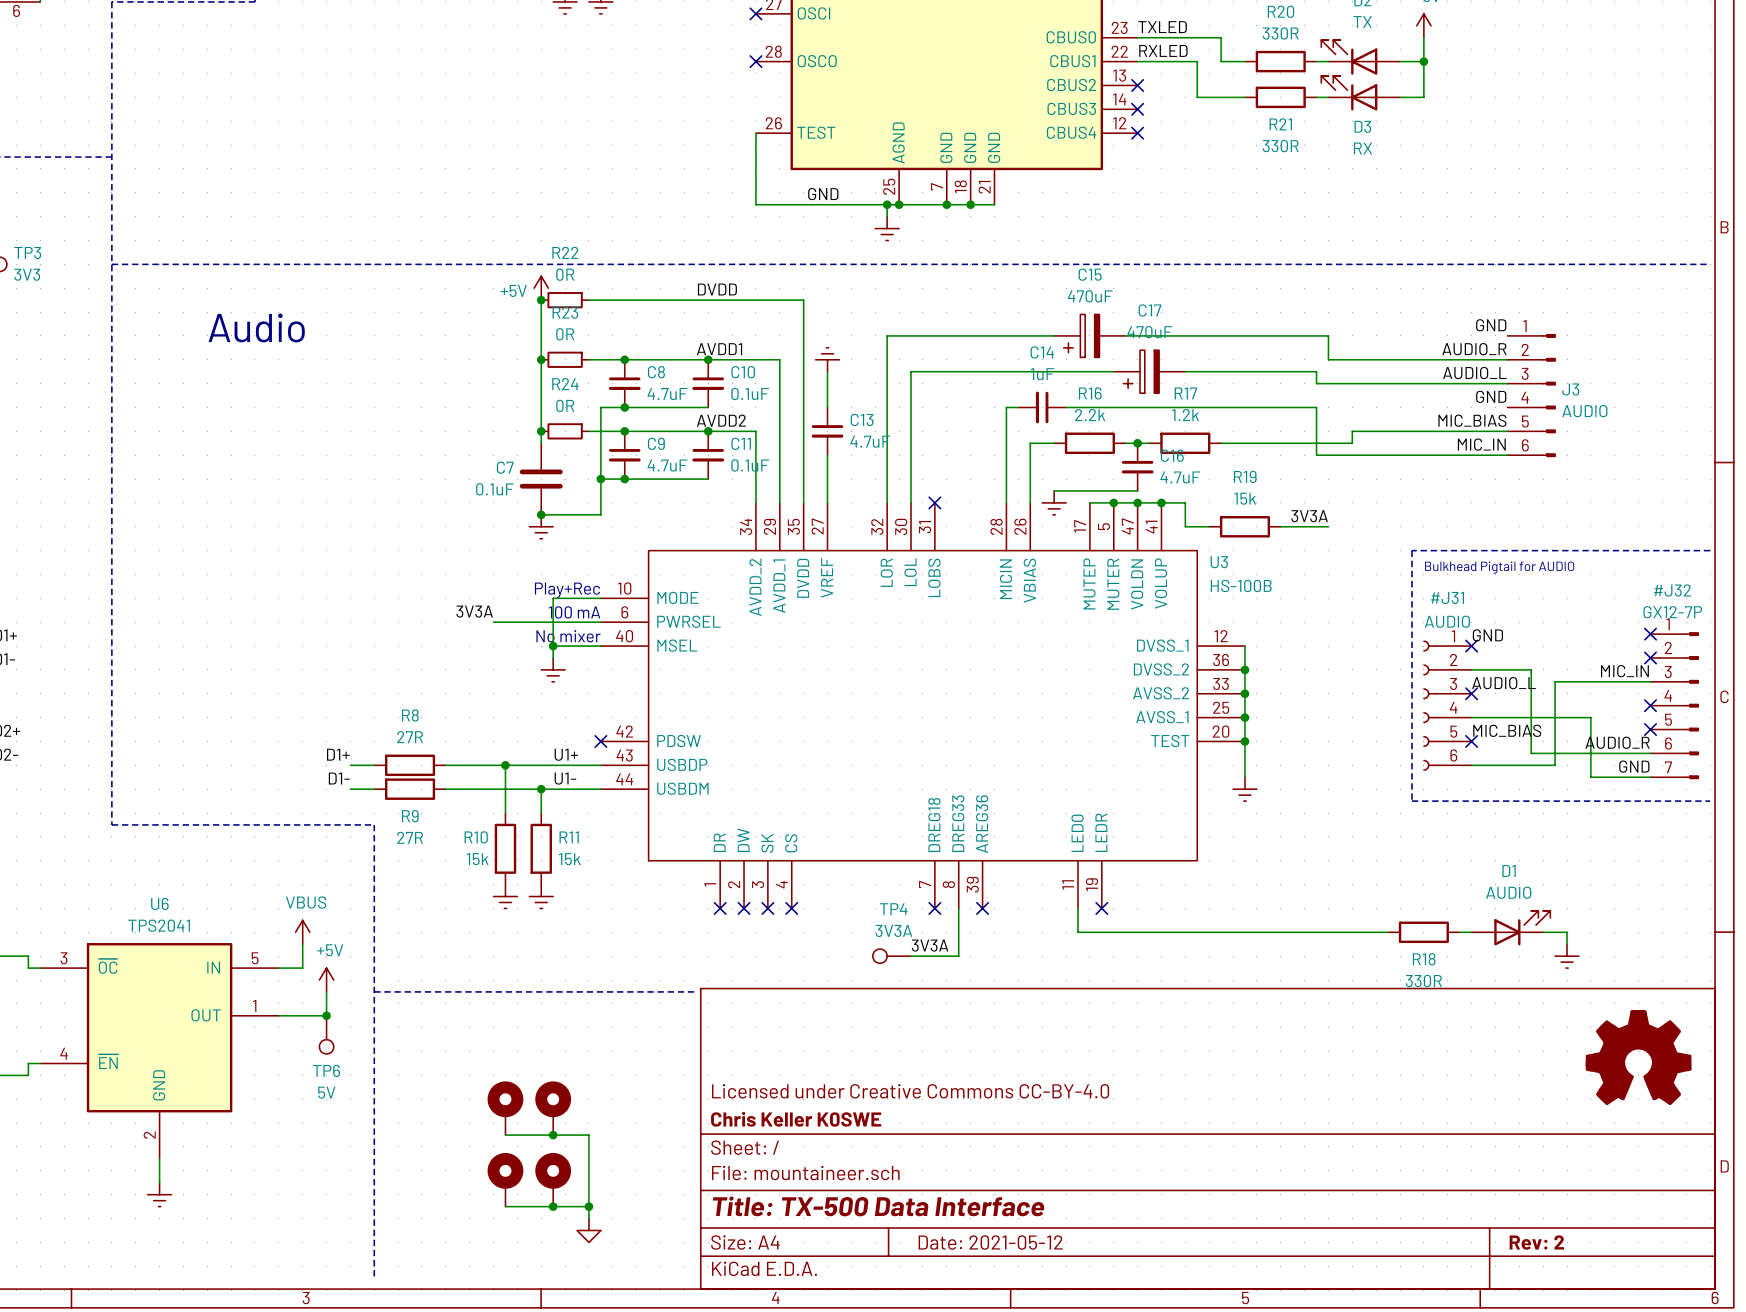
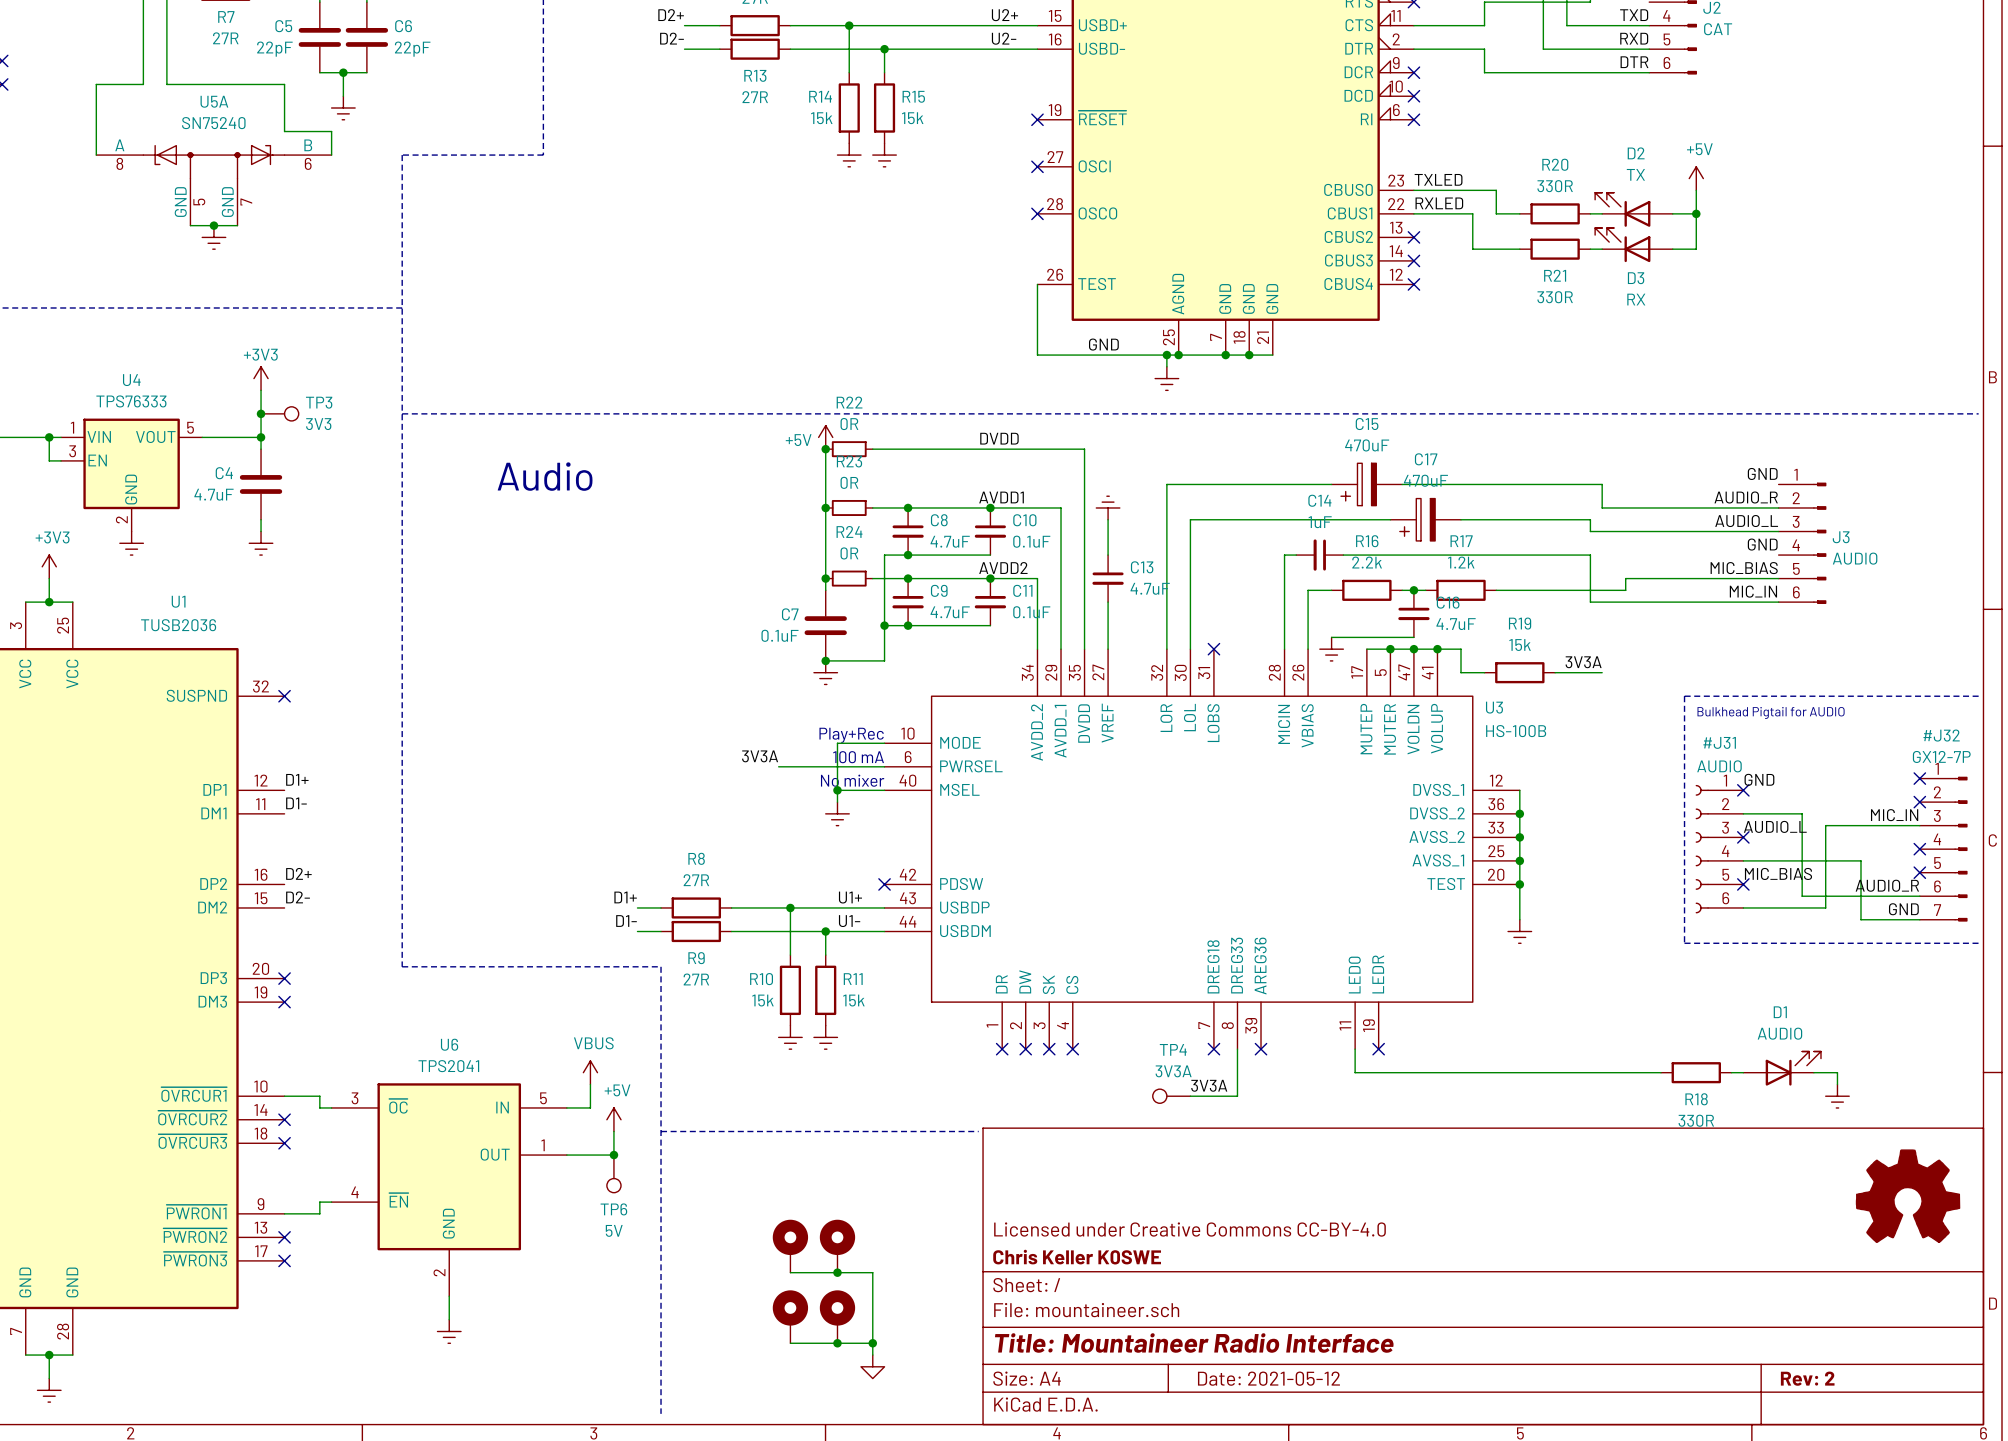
title block: Title: TX-500 Data Interface (878, 1206) -> Title: Mountaineer Radio Interface (1194, 1343)

